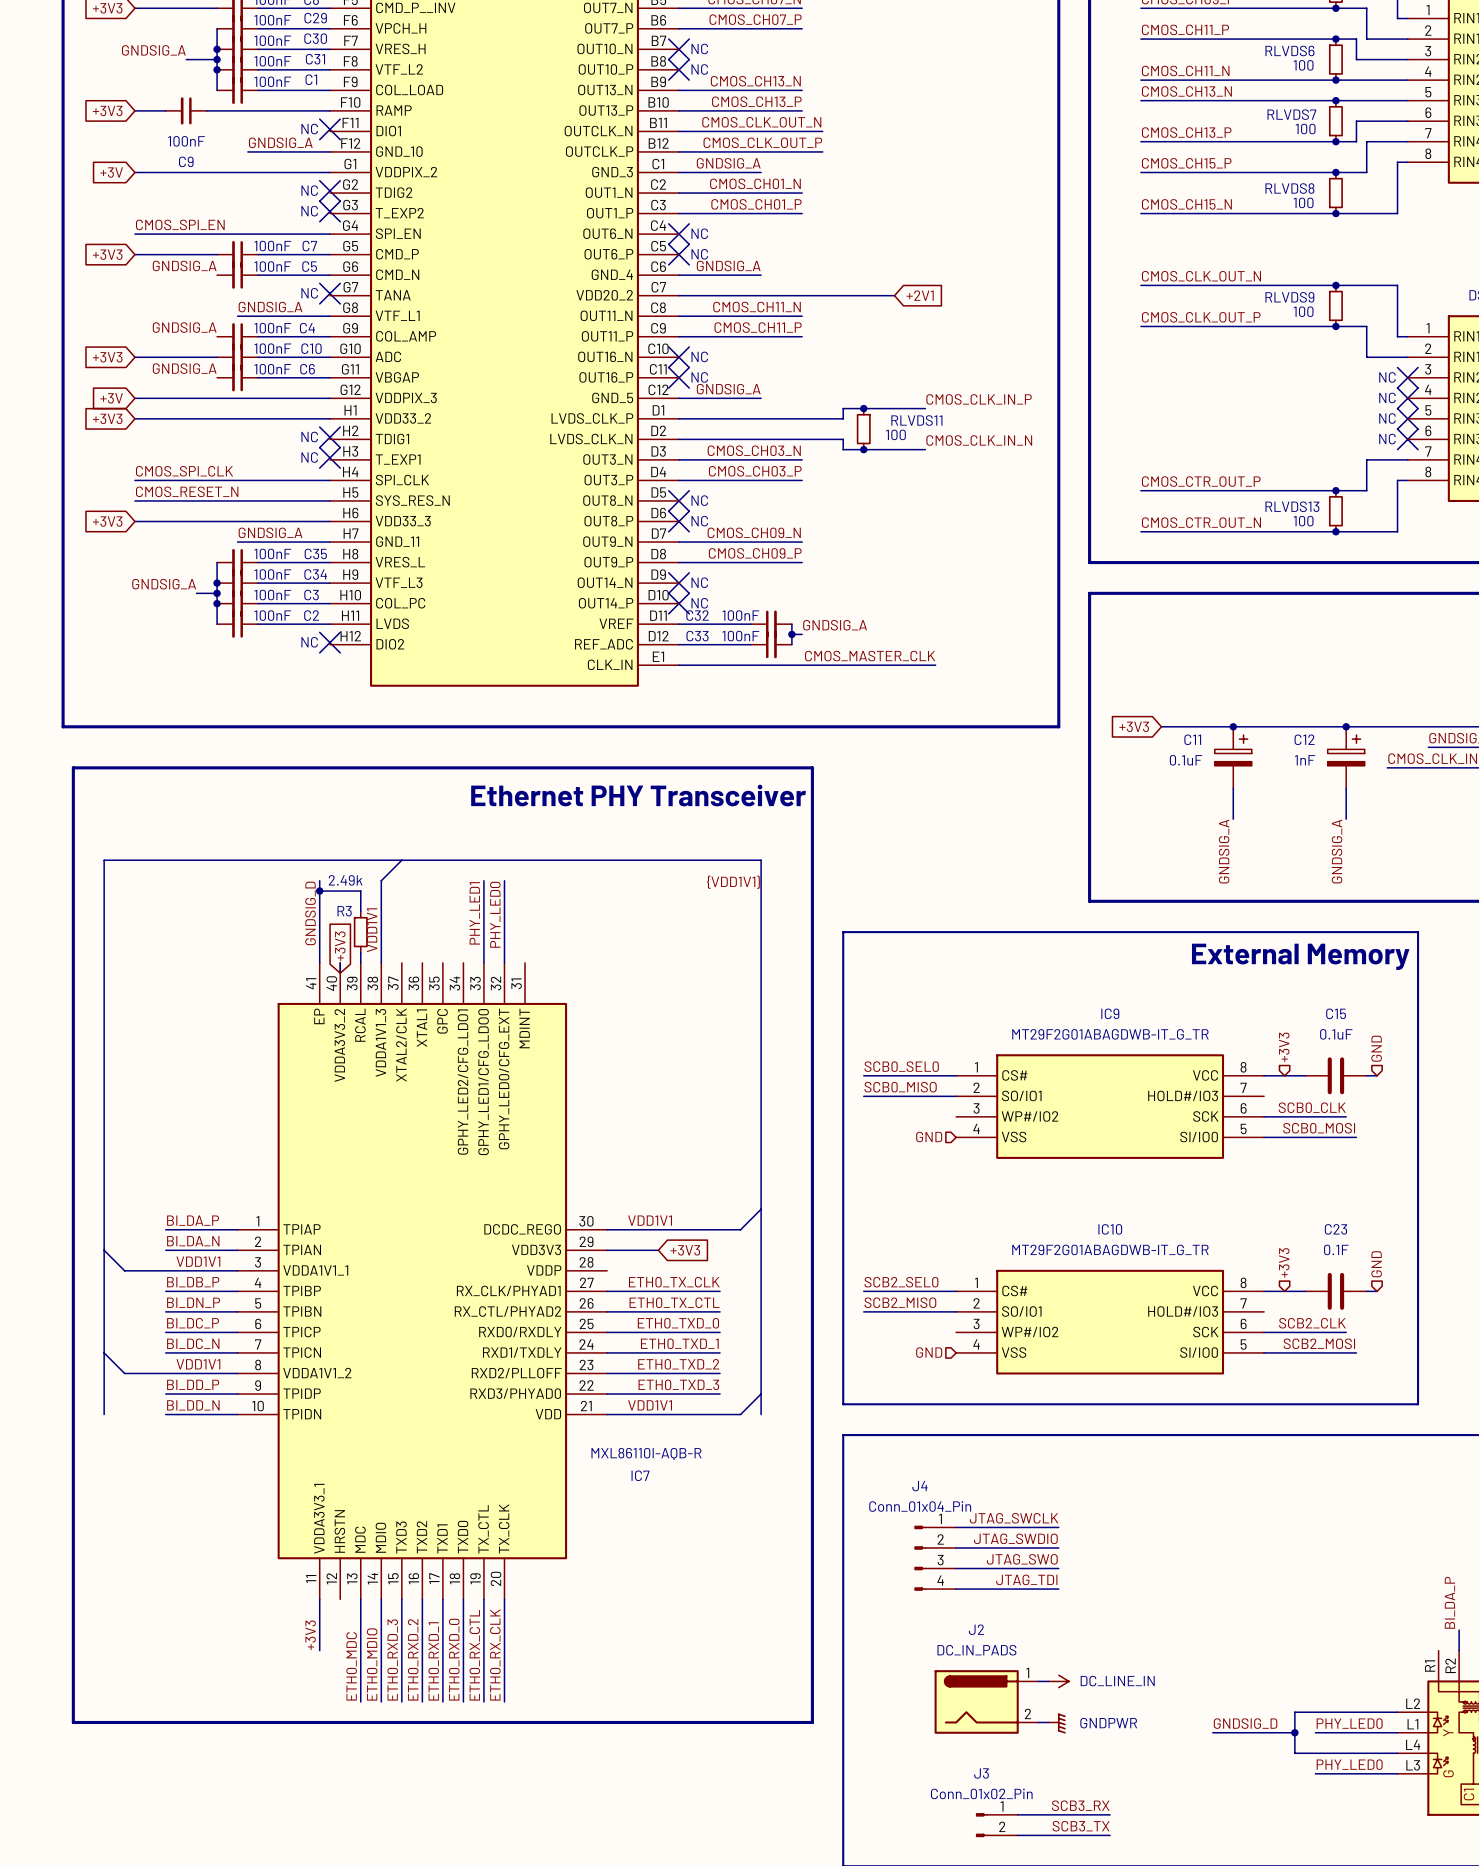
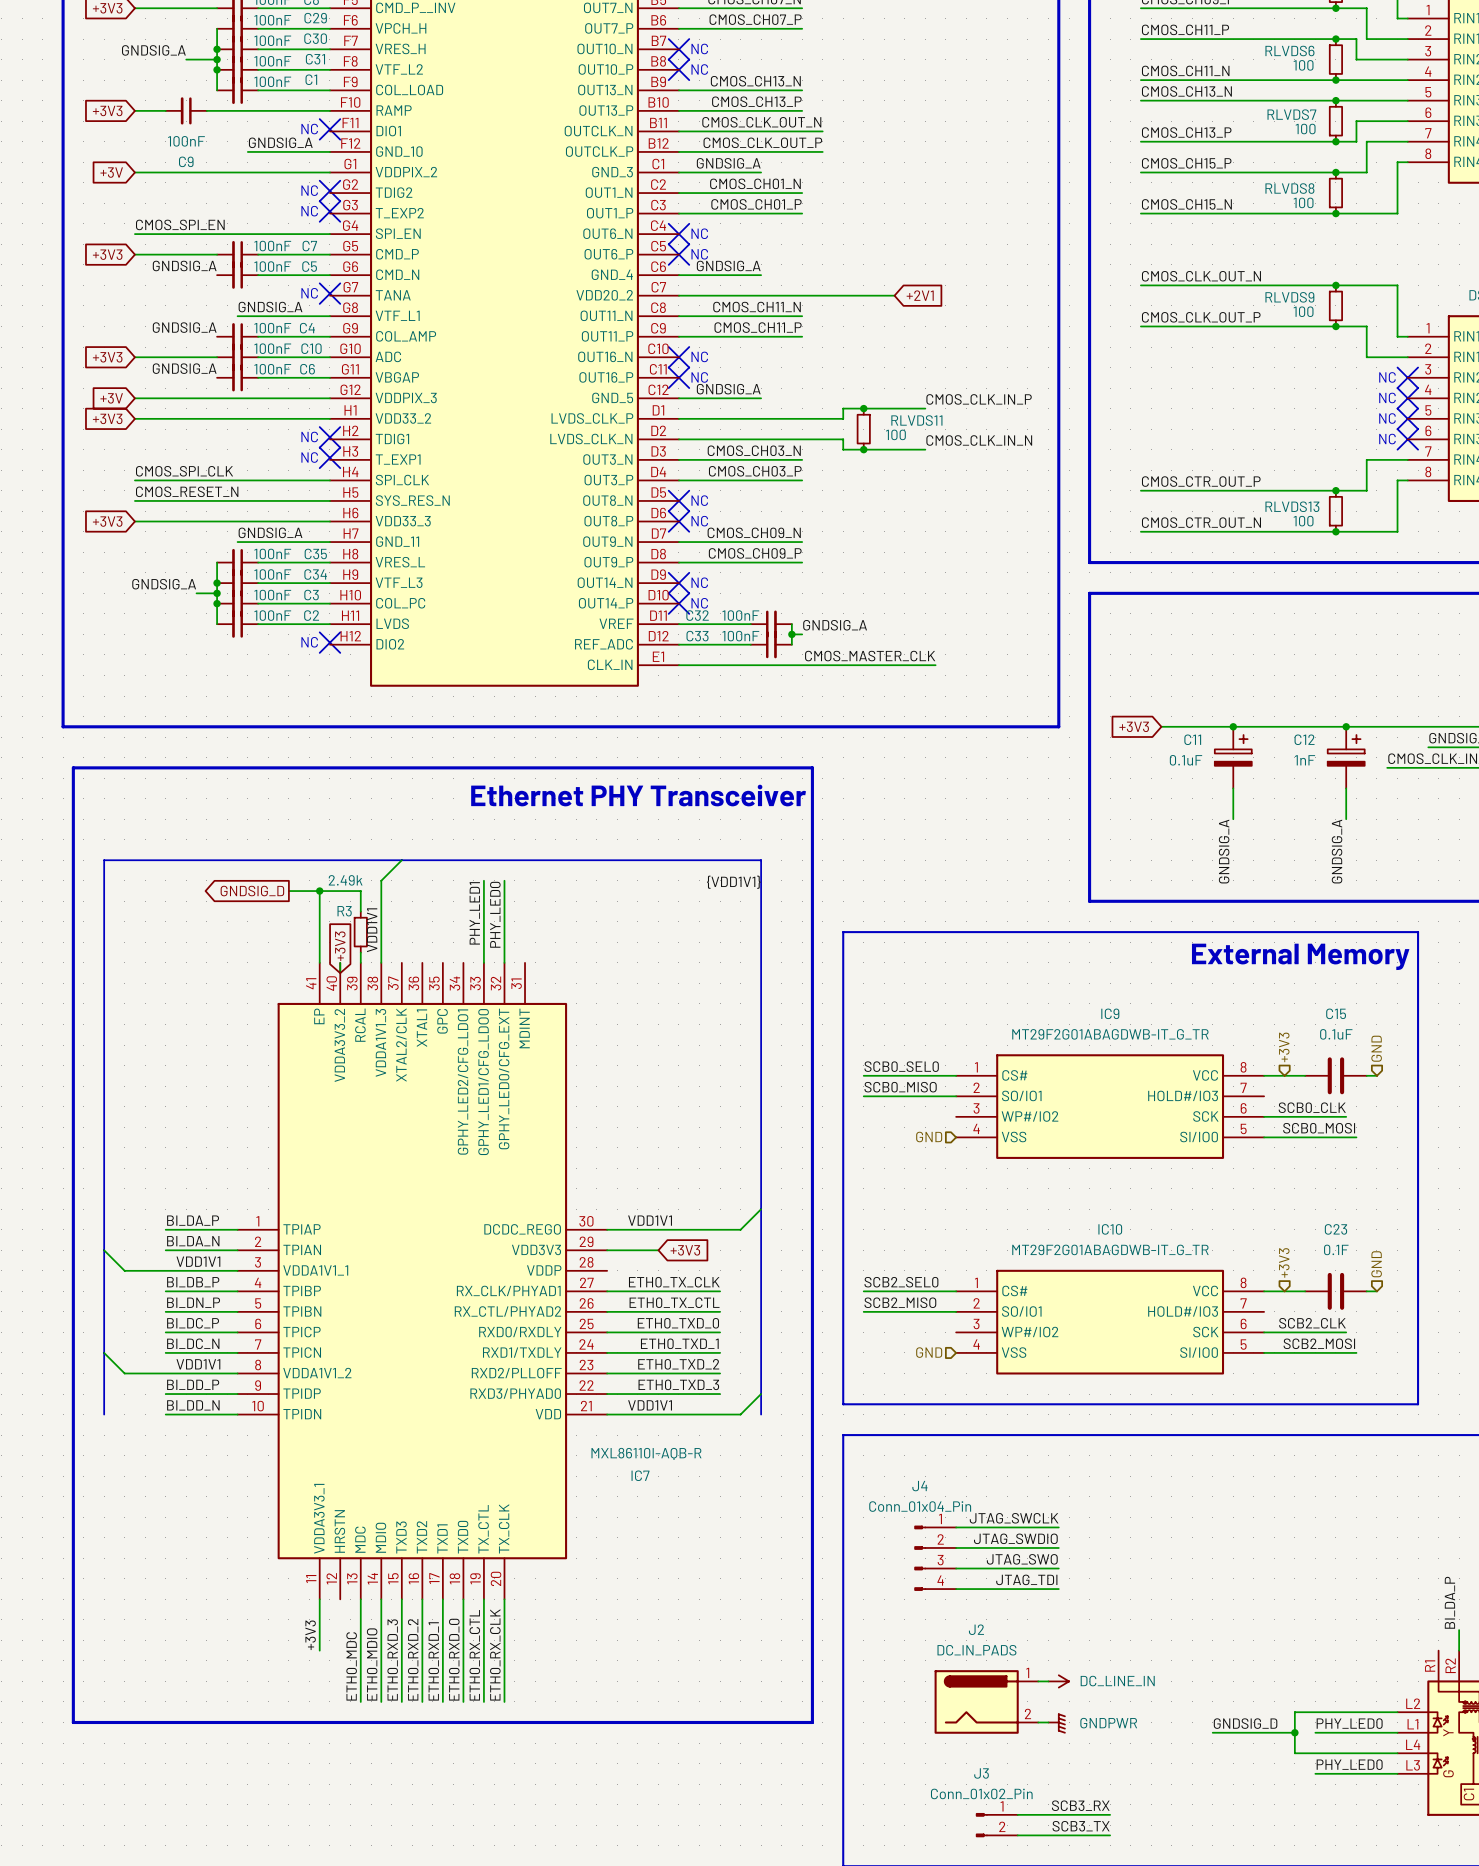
wire: (319, 880) (319, 891) -> (288, 891) (319, 891)
global label: none -> GNDSIG_D (252, 891)
label: GNDSIG_D (310, 913) -> none

